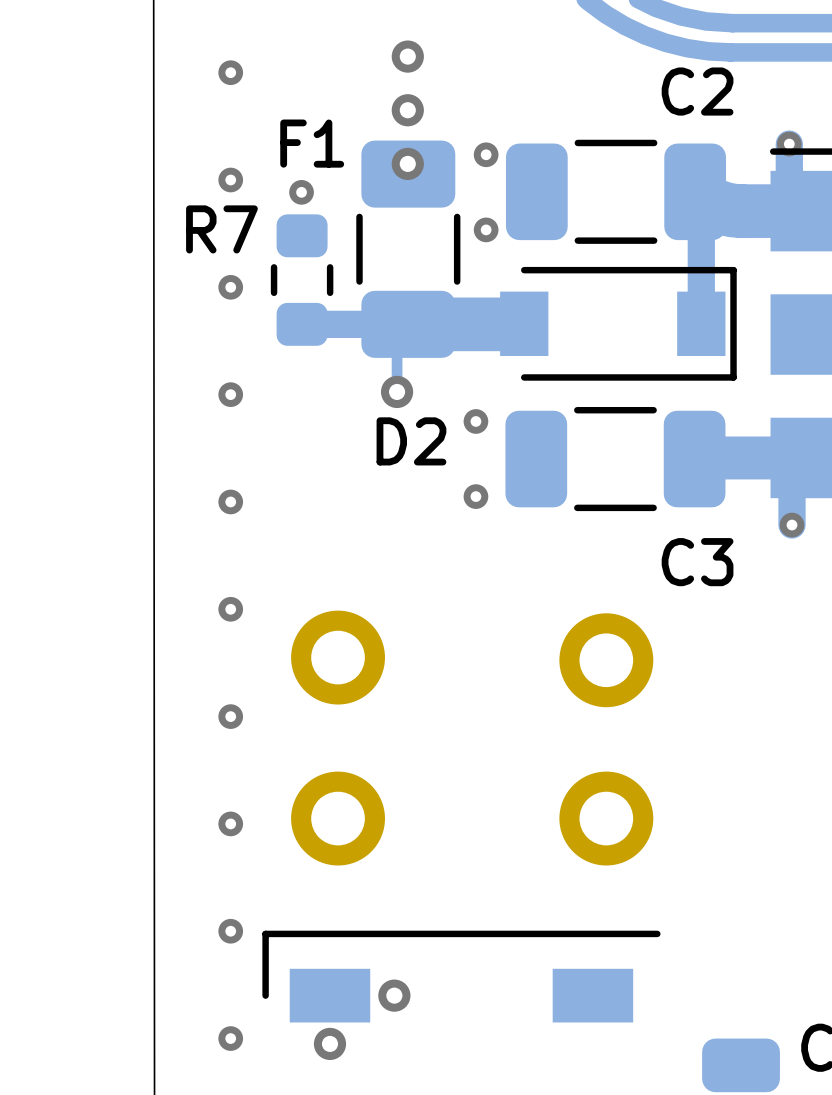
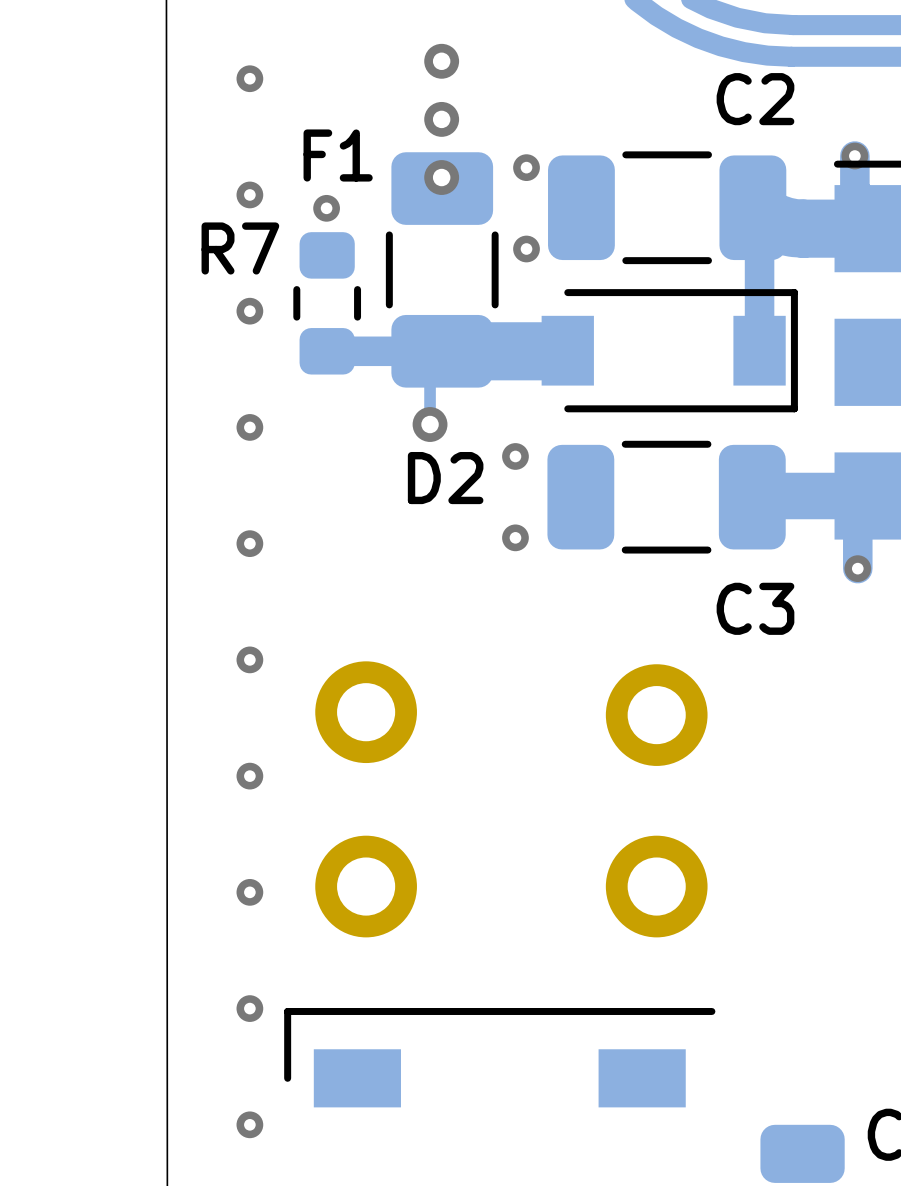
via: (394, 995) -> none
via: (329, 1043) -> none

